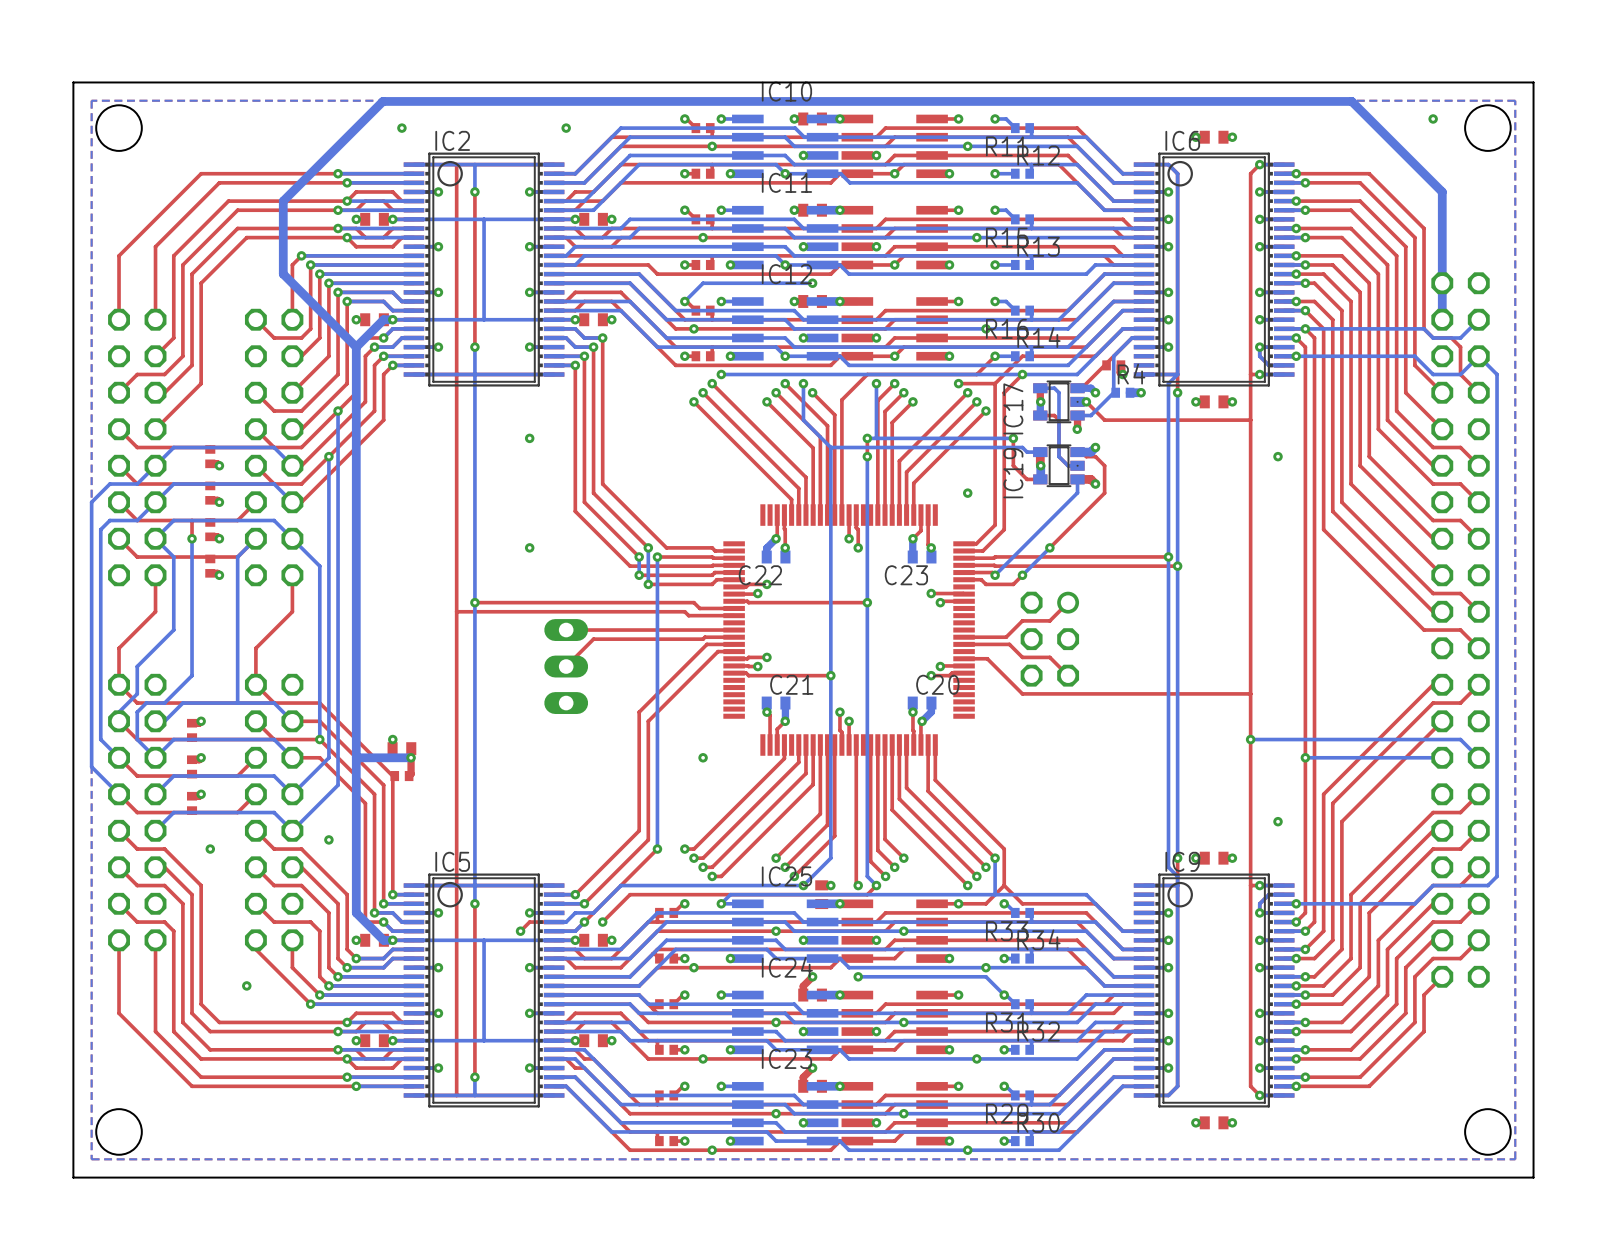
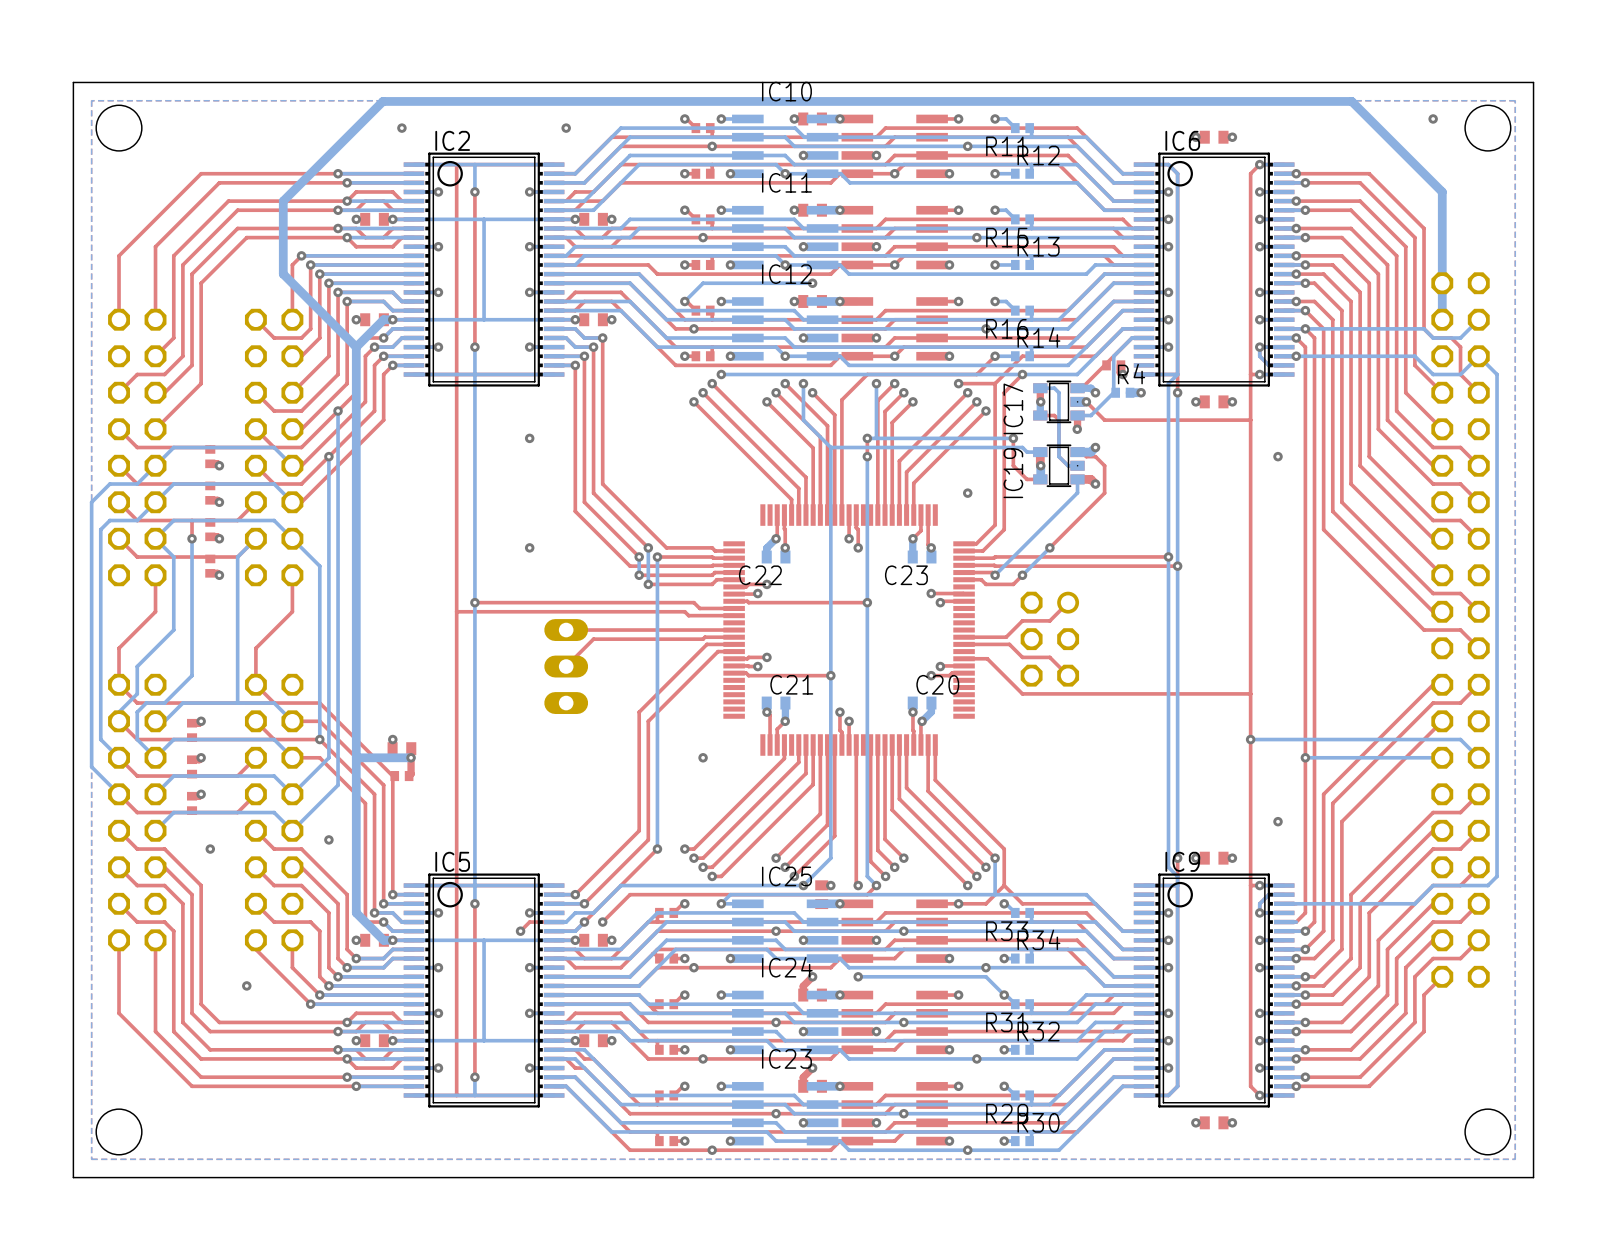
via: (1296, 903) -> none
via: (1296, 922) -> none

